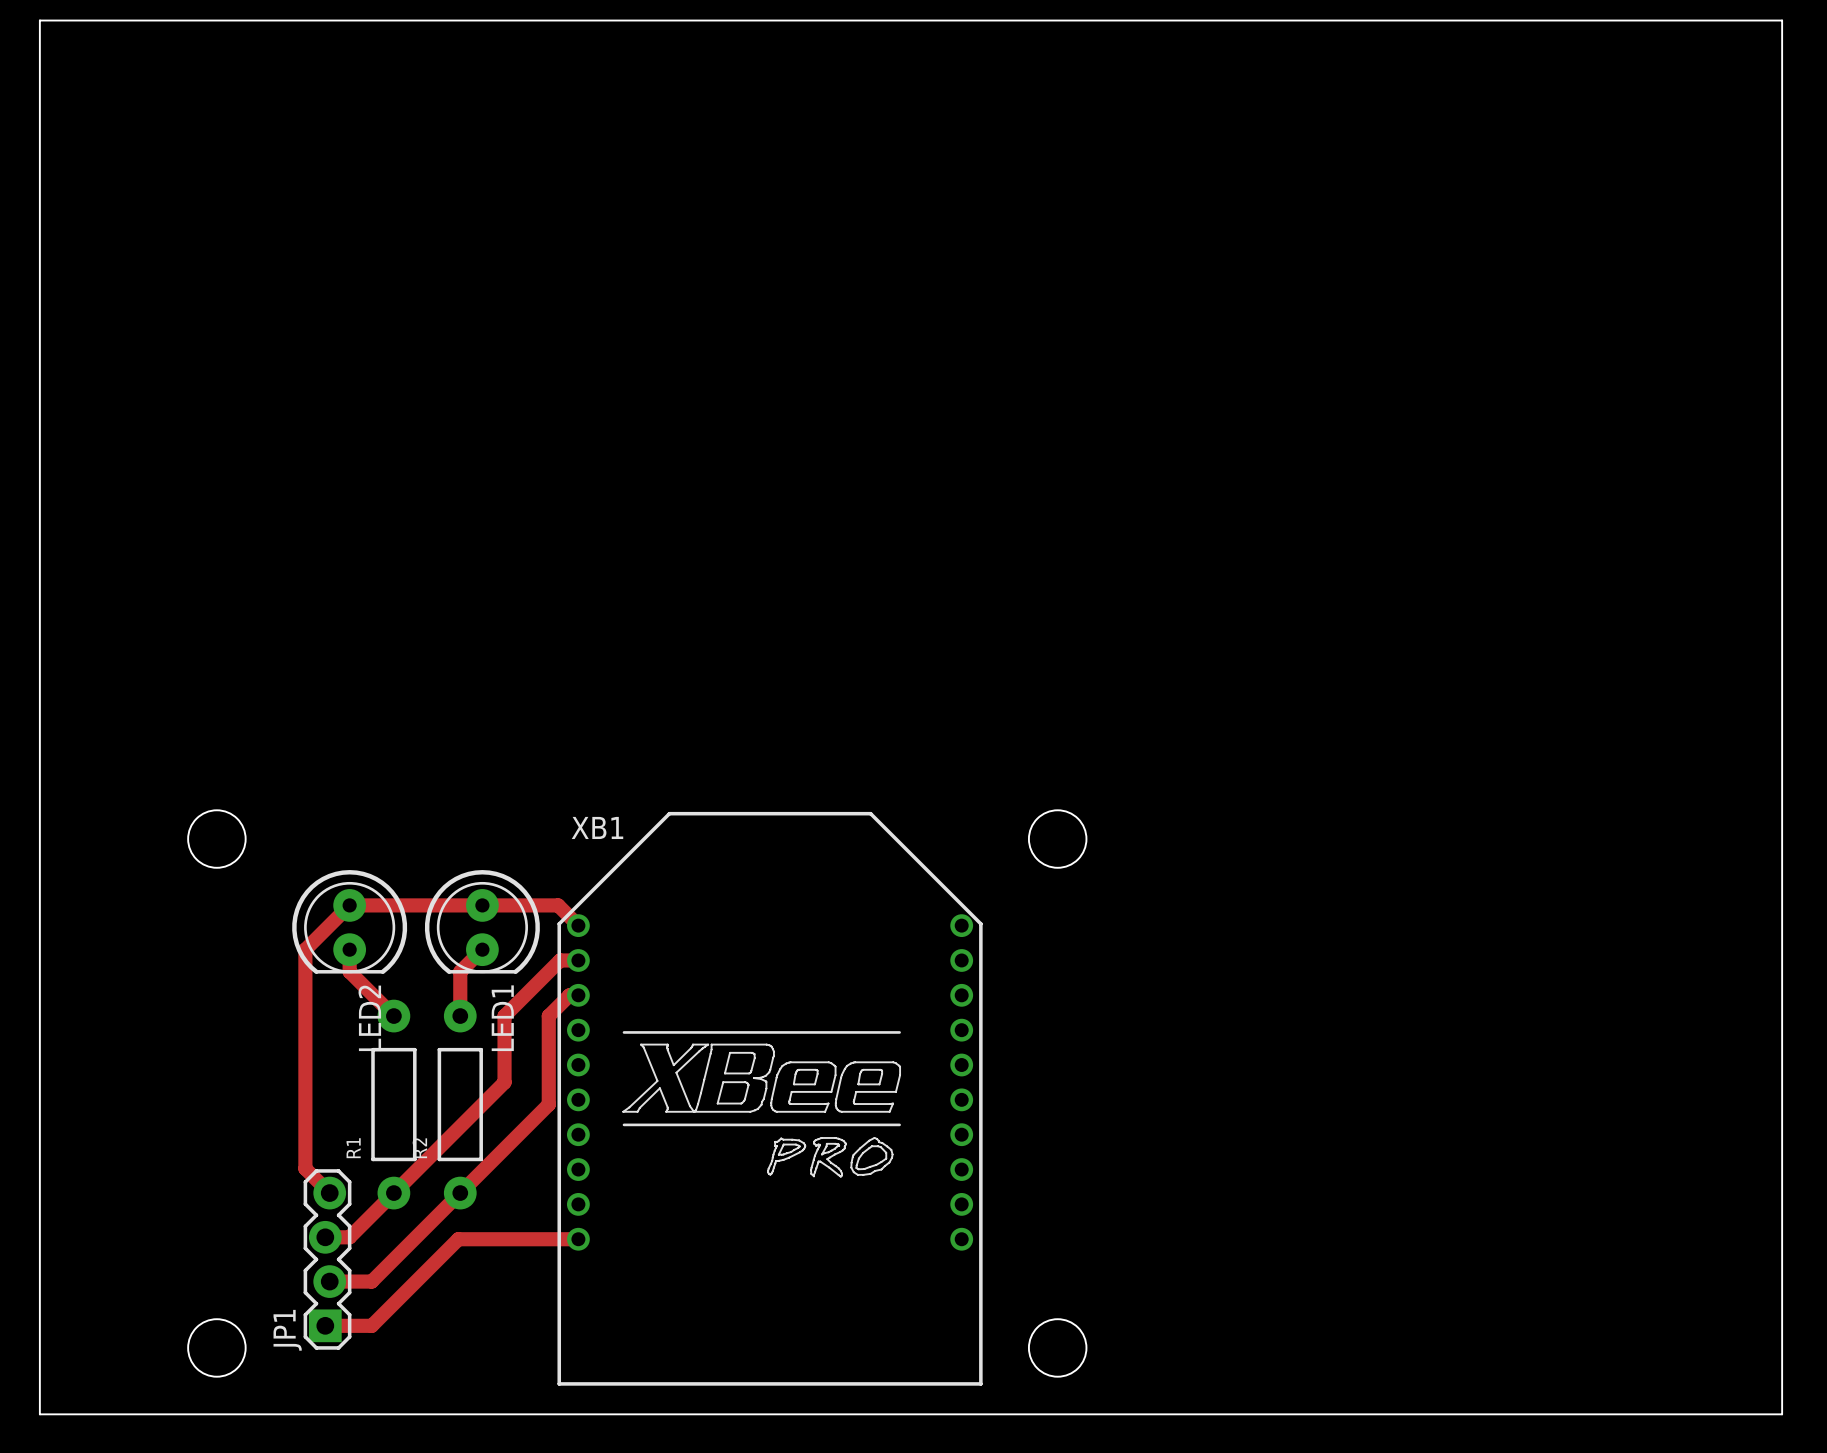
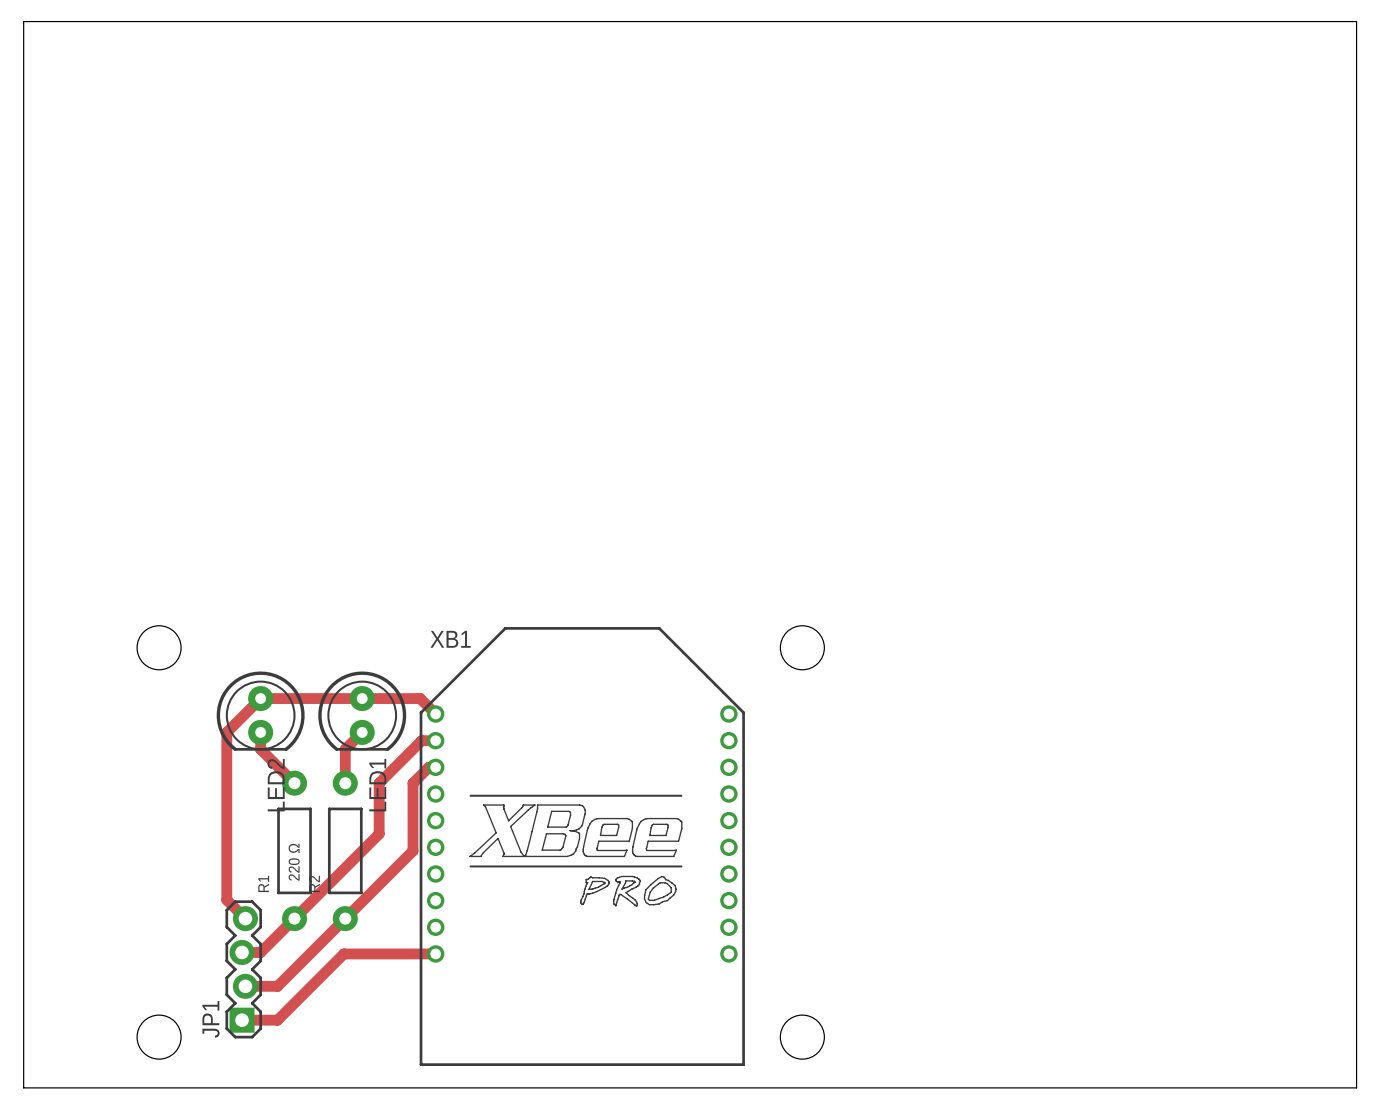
R1 value: none -> 220 Ω (294, 862)

